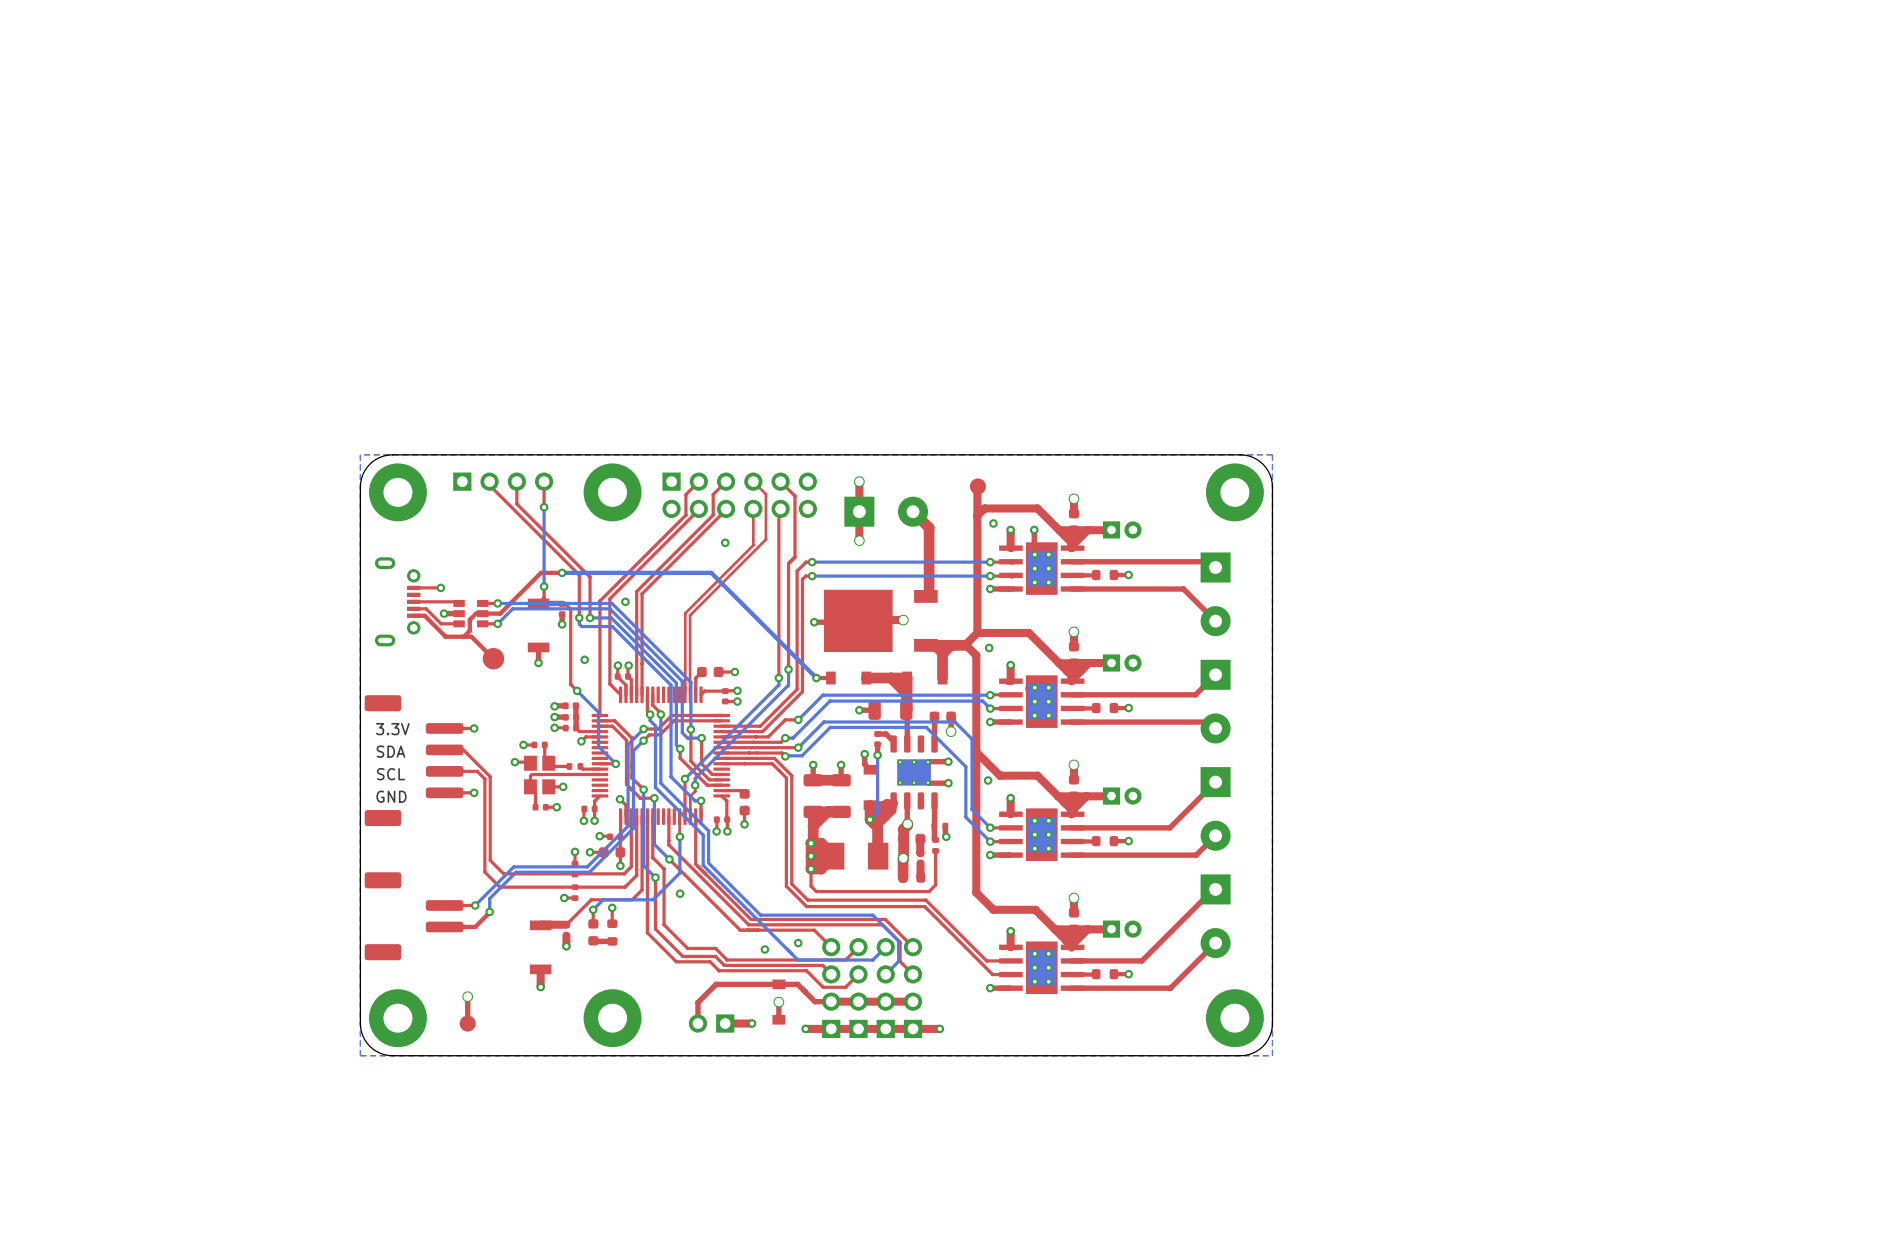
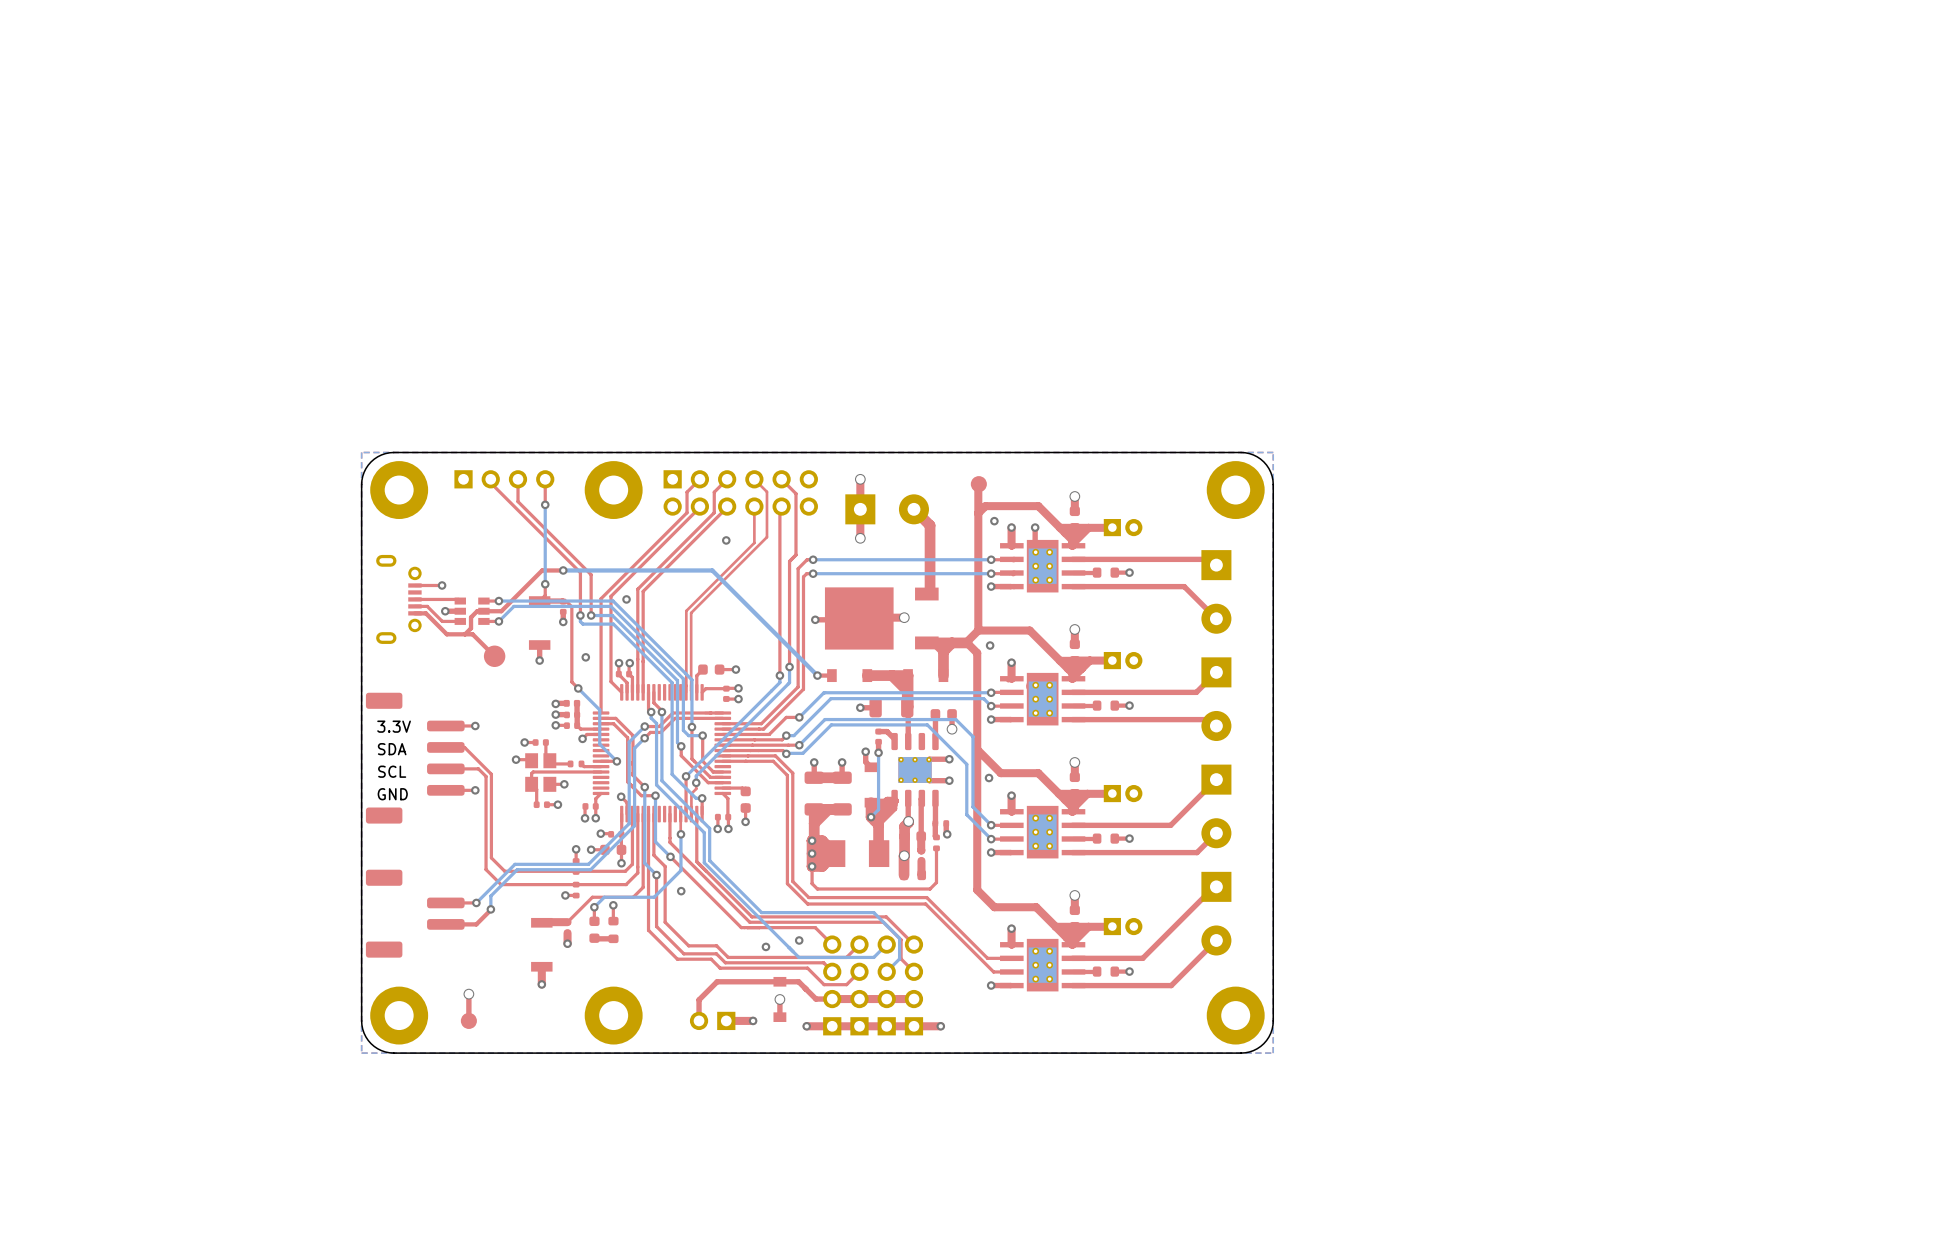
top track: none -> (921, 798) (921, 836)

